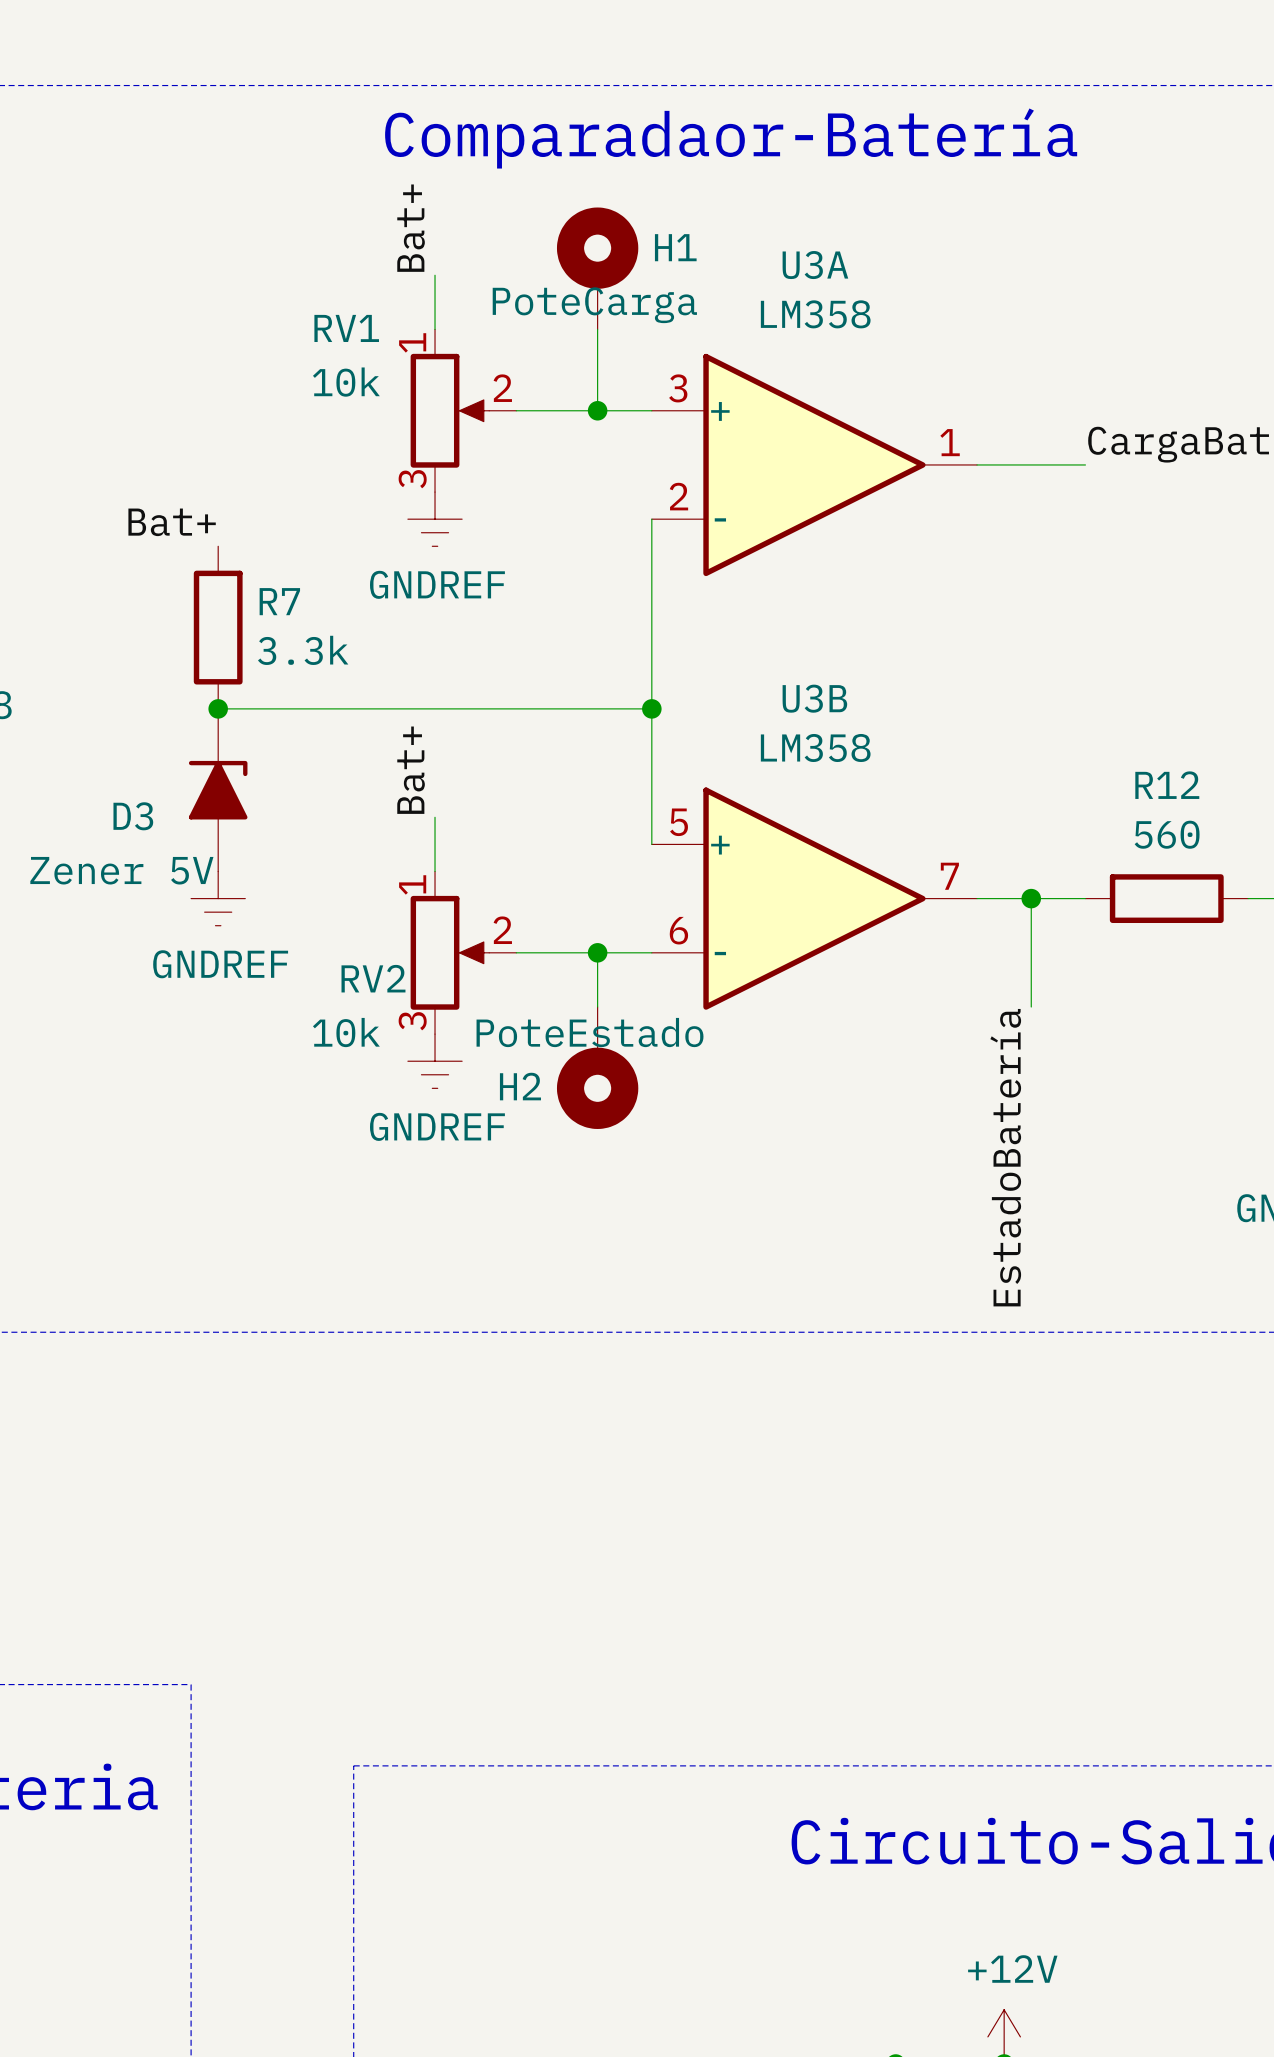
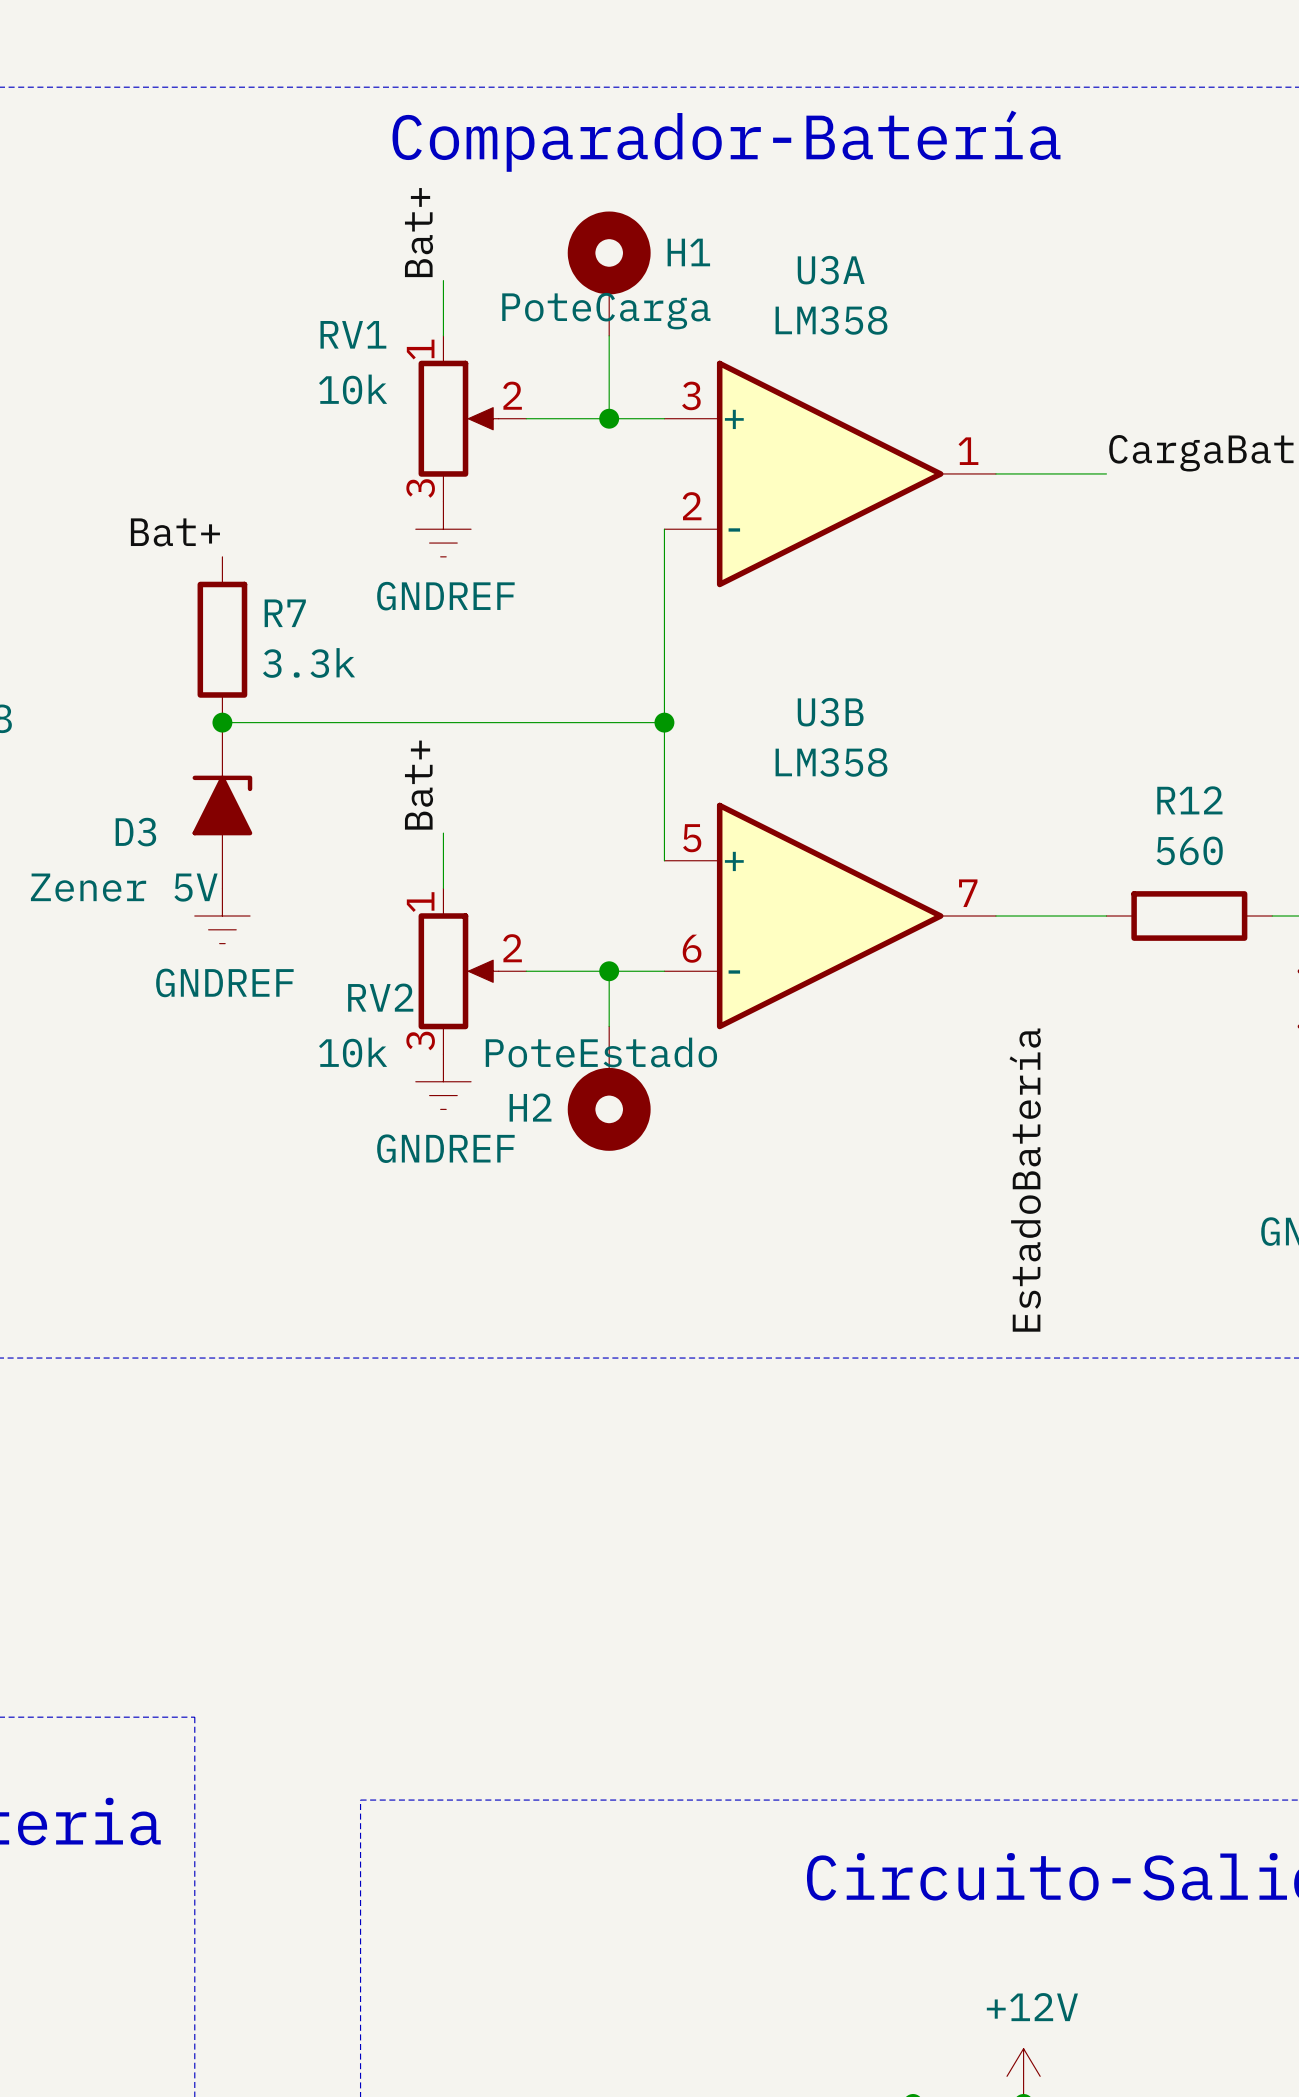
text: Comparadaor-Batería (731, 138) -> Comparador-Batería (726, 141)
wire: (1031, 898) (1031, 1007) -> none
junction: (1031, 898) -> none

